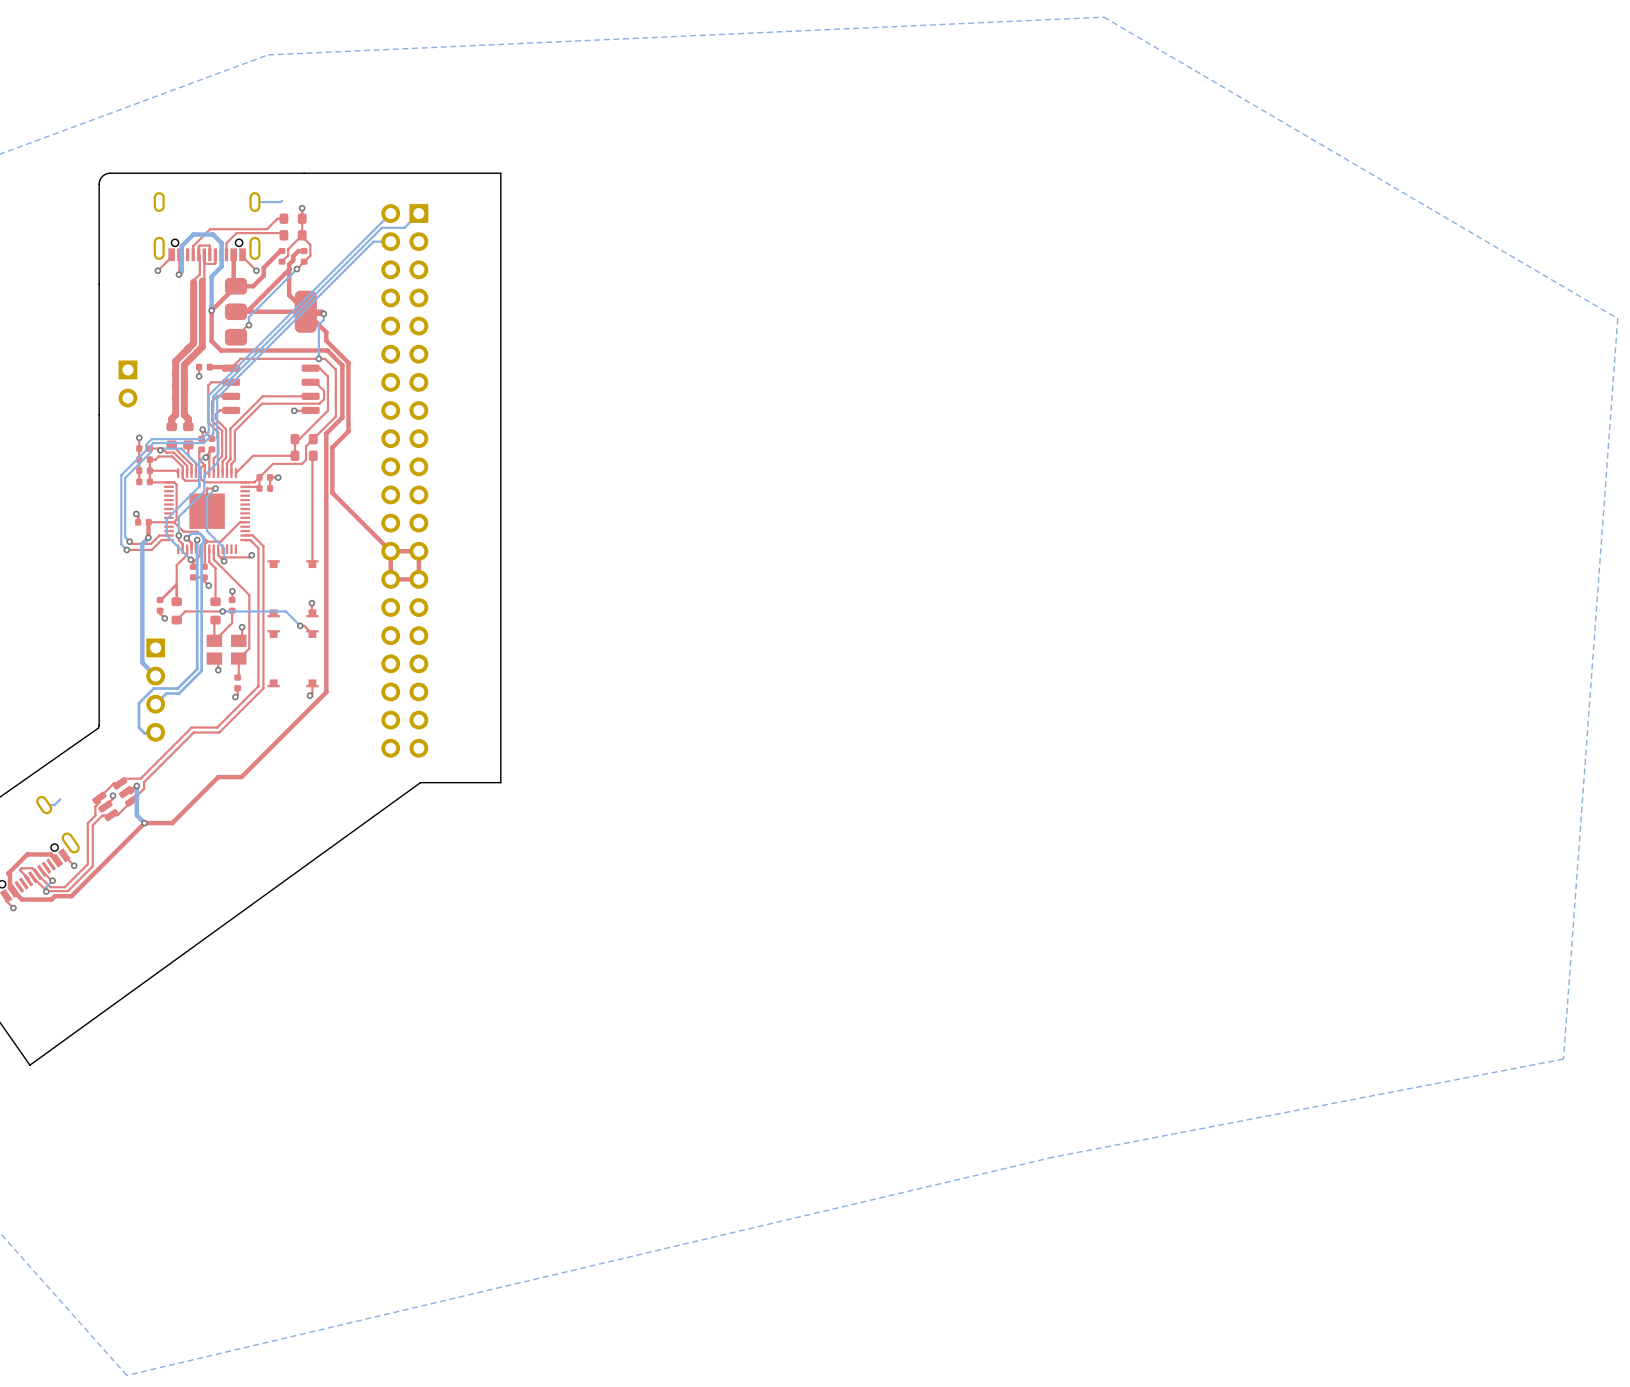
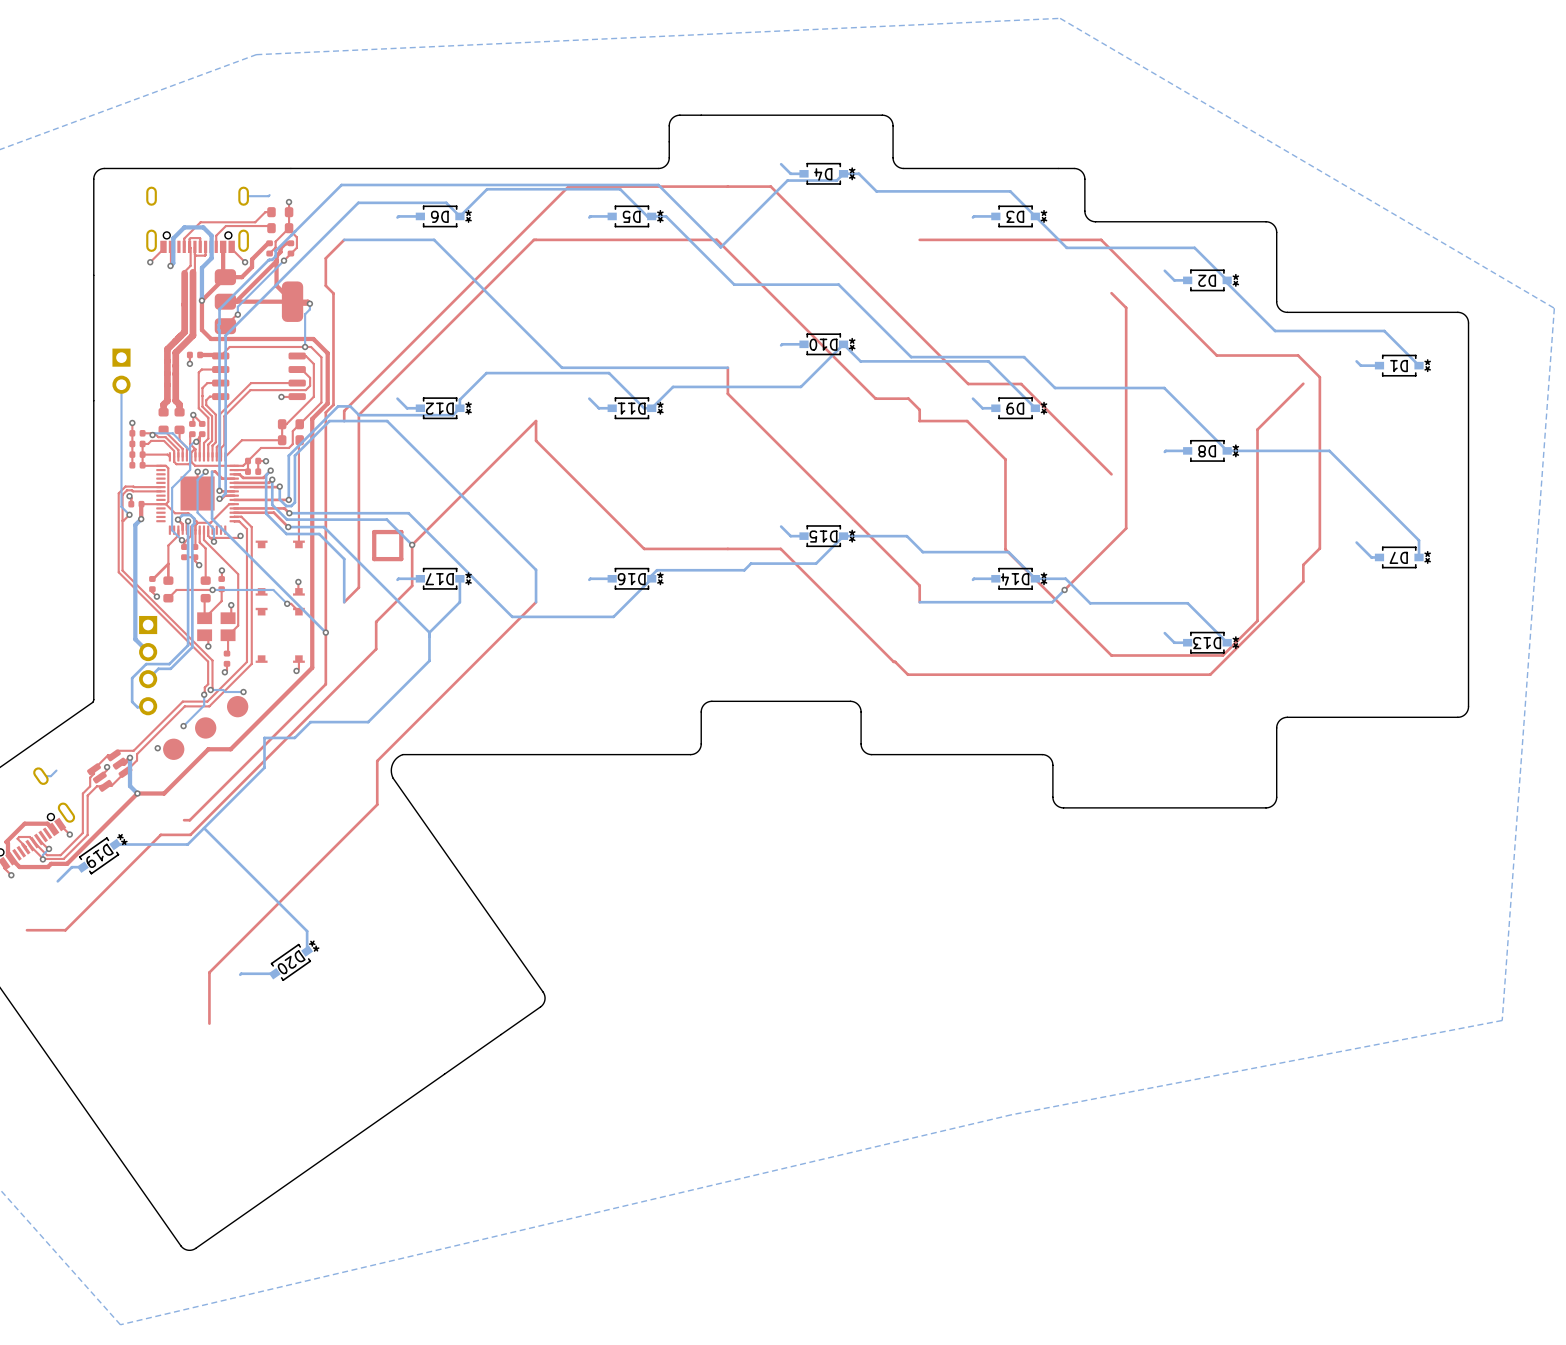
bottom track: none -> (781, 164) (790, 173) (804, 173)
board edge: (500, 173) (500, 782) -> (480, 168) (660, 168) (666, 165) (668, 160) (669, 122) (673, 117) (678, 115) (883, 115) (889, 117) (892, 122) (893, 160) (896, 165) (901, 168) (1075, 168) (1080, 170) (1084, 175) (1085, 213) (1087, 218) (1093, 221) (1270, 222) (1276, 231) (1276, 302) (1279, 308) (1283, 311) (1459, 312) (1465, 315) (1468, 323) (1467, 710) (1464, 714) (1457, 717) (1282, 718) (1276, 726) (1276, 798) (1270, 806) (1061, 807) (1056, 804) (1053, 799) (1052, 764) (1046, 755) (869, 754) (864, 751) (861, 746) (860, 708) (857, 703) (851, 701) (708, 701) (703, 705) (701, 710) (700, 747) (697, 752) (691, 754) (480, 754)
D4: none -> (823, 173)
bottom track: (390, 213) (208, 395) (208, 432) (201, 439) (151, 439) (146, 444) (146, 450) (121, 475) (121, 544) (126, 549) -> none
bottom track: (418, 213) (404, 227) (381, 227) (213, 396) (213, 433) (203, 443) (153, 443) (150, 446) (150, 452) (125, 477) (125, 537) (129, 541) -> none
bottom track: none -> (420, 216) (397, 217)
D6: none -> (440, 216)
bottom track: none -> (612, 216) (589, 217)
D5: none -> (631, 216)
bottom track: none -> (995, 216) (972, 217)
D3: none -> (1015, 216)
bottom track: none -> (294, 231) (341, 184) (658, 184) (720, 247) (787, 180) (836, 180) (843, 173) (858, 173) (876, 191) (1010, 191) (1066, 247) (1194, 247) (1275, 331) (1384, 331) (1419, 365)
bottom track: none -> (294, 231) (291, 235)
bottom track: (390, 241) (373, 241) (217, 398) (217, 462) (204, 475) (204, 491) (178, 516) (178, 535) -> none
bottom track: none -> (291, 235) (275, 250) (275, 256) (269, 259)
top track: none -> (344, 239) (325, 258) (325, 285) (333, 293) (333, 404) (325, 412) (325, 684) (189, 820) (184, 820)
bottom track: none -> (344, 239) (434, 239) (561, 367) (727, 367)
top track: none -> (919, 239) (1101, 239) (1216, 355) (1298, 355) (1319, 377) (1319, 548) (1303, 564) (1303, 581) (1210, 674) (907, 674) (780, 548) (644, 548) (536, 440) (536, 421) (412, 544) (412, 585) (376, 621) (376, 649) (190, 834) (160, 834) (65, 930) (26, 930)
bottom track: none -> (269, 260) (219, 309) (219, 490)
bottom track: none -> (1164, 270) (1174, 280) (1187, 280)
D2: none -> (1207, 280)
top track: none -> (1111, 293) (1126, 307) (1126, 528) (1064, 589)
top track: (307, 313) (326, 332) (326, 340) (348, 362) (348, 431) (332, 447) (332, 492) (390, 551) -> none
bottom track: none -> (804, 344) (781, 345)
D10: none -> (823, 344)
bottom track: none -> (1356, 361) (1360, 365) (1379, 365)
D1: none -> (1399, 365)
top track: none -> (727, 367) (727, 393) (919, 585) (919, 602)
top track: none -> (1303, 383) (1257, 429) (1257, 620) (1222, 655) (1111, 655) (1005, 549) (1005, 459) (967, 421) (919, 421) (919, 409) (908, 398) (875, 398) (716, 239) (533, 239) (358, 414) (358, 587) (344, 602)
bottom track: none -> (121, 384) (121, 506) (129, 514)
bottom track: none -> (397, 398) (407, 408) (420, 408)
bottom track: none -> (589, 398) (598, 408) (612, 408)
bottom track: none -> (972, 398) (982, 408) (995, 408)
D12: none -> (440, 408)
D11: none -> (631, 408)
D9: none -> (1015, 408)
bottom track: none -> (1035, 408) (988, 361) (860, 361) (843, 344) (800, 386) (673, 386) (651, 408) (644, 408) (609, 373) (486, 373) (459, 399) (459, 408) (452, 415) (359, 415) (350, 406) (338, 406) (288, 455) (288, 499)
top track: none -> (344, 421) (344, 410) (568, 186) (770, 186) (968, 384) (1021, 384) (1111, 474)
bottom track: none -> (1187, 450) (1164, 451)
D8: none -> (1207, 450)
part: (404, 480) -> none
top track: none -> (270, 470) (263, 477) (243, 477) (239, 474) (234, 474)
bottom track: none -> (270, 470) (266, 475) (266, 513) (286, 534) (319, 534) (344, 559) (344, 602)
via: none -> (270, 470)
via: none -> (197, 471)
top track: (215, 488) (207, 488) -> none
top track: none -> (212, 471) (215, 471) (222, 478) (234, 478)
bottom track: none -> (212, 471) (212, 518) (325, 632)
top track: none -> (272, 479) (269, 482) (234, 482)
bottom track: none -> (272, 479) (272, 504) (287, 519) (386, 519) (412, 544)
via: none -> (272, 479)
top track: none -> (279, 486) (234, 487)
bottom track: none -> (279, 486) (279, 499) (286, 506) (291, 506) (294, 502) (294, 455) (329, 421) (387, 421) (536, 569) (536, 602)
via: none -> (279, 486)
top track: none -> (160, 487) (125, 486) (118, 493) (118, 572) (208, 661) (208, 684)
bottom track: (180, 505) (166, 519) (166, 535) (180, 549) -> (172, 487) (172, 530)
top track: none -> (160, 491) (127, 490) (122, 494) (122, 570) (212, 660) (212, 688) (210, 690)
top track: none -> (219, 490) (234, 491)
via: none -> (219, 490)
top track: none -> (234, 495) (224, 495) (219, 498)
bottom track: none -> (219, 498) (225, 493) (225, 335) (358, 202) (446, 202) (459, 216) (487, 189) (620, 189) (647, 216) (666, 216) (734, 284) (838, 284) (911, 357) (1024, 357) (1055, 388) (1164, 388) (1227, 450) (1329, 450) (1419, 540) (1419, 557)
via: none -> (219, 498)
top track: none -> (288, 499) (234, 499)
via: none -> (288, 499)
top track: none -> (234, 508) (284, 508) (289, 513)
top track: none -> (234, 512) (273, 512) (288, 527)
bottom track: none -> (289, 513) (408, 513) (512, 616) (613, 616) (651, 578) (651, 575) (657, 570) (744, 570) (751, 563) (816, 563) (843, 536) (906, 536) (922, 552) (1008, 552) (1035, 578) (1065, 578) (1090, 603) (1187, 603) (1227, 642)
via: none -> (289, 513)
top track: none -> (129, 514) (122, 520)
via: none -> (129, 514)
top track: (168, 535) (159, 535) (150, 543) (131, 543) (129, 541) -> none
top track: (178, 535) (182, 549) -> none
via: (178, 535) -> none
top track: (168, 539) (161, 539) (151, 549) (126, 549) -> none
via: (129, 541) -> none
bottom track: none -> (781, 526) (790, 536) (804, 536)
bottom track: none -> (288, 527) (324, 527) (429, 632)
via: none -> (288, 527)
via: (126, 549) -> none
D15: none -> (823, 536)
bottom track: none -> (1356, 542) (1371, 557) (1379, 557)
via: none -> (412, 544)
D7: none -> (1399, 557)
bottom track: none -> (420, 578) (397, 579)
D17: none -> (440, 578)
bottom track: none -> (459, 578) (459, 602) (429, 632)
bottom track: none -> (612, 578) (589, 579)
D16: none -> (631, 578)
bottom track: none -> (995, 578) (972, 579)
D14: none -> (1015, 578)
bottom track: none -> (1064, 589) (1052, 602) (919, 602)
via: none -> (1064, 589)
top track: none -> (536, 602) (377, 761) (377, 804) (209, 972) (209, 1023)
via: none -> (325, 632)
bottom track: none -> (429, 632) (429, 660) (368, 722) (310, 722) (294, 737) (264, 737) (264, 767) (187, 844) (115, 844)
bottom track: none -> (1164, 633) (1174, 642) (1187, 642)
D13: none -> (1207, 642)
top track: none -> (208, 684) (204, 687) (204, 694)
bottom track: none -> (210, 690) (243, 692)
via: none -> (210, 690)
via: none -> (243, 692)
bottom track: none -> (204, 694) (204, 705) (183, 726)
via: none -> (204, 694)
part: none -> (237, 706)
via: none -> (183, 726)
part: none -> (205, 727)
via: none -> (157, 748)
part: none -> (173, 749)
board edge: (420, 782) (29, 1065) -> (402, 754) (395, 759) (392, 764) (391, 772) (393, 778) (543, 992) (544, 1000) (540, 1006) (190, 1250) (180, 1245) (27, 1026)
bottom track: none -> (204, 828) (307, 931) (307, 951)
D19: none -> (99, 855)
bottom track: none -> (82, 867) (71, 867) (57, 881)
D20: none -> (290, 962)
bottom track: none -> (274, 973) (240, 974)

